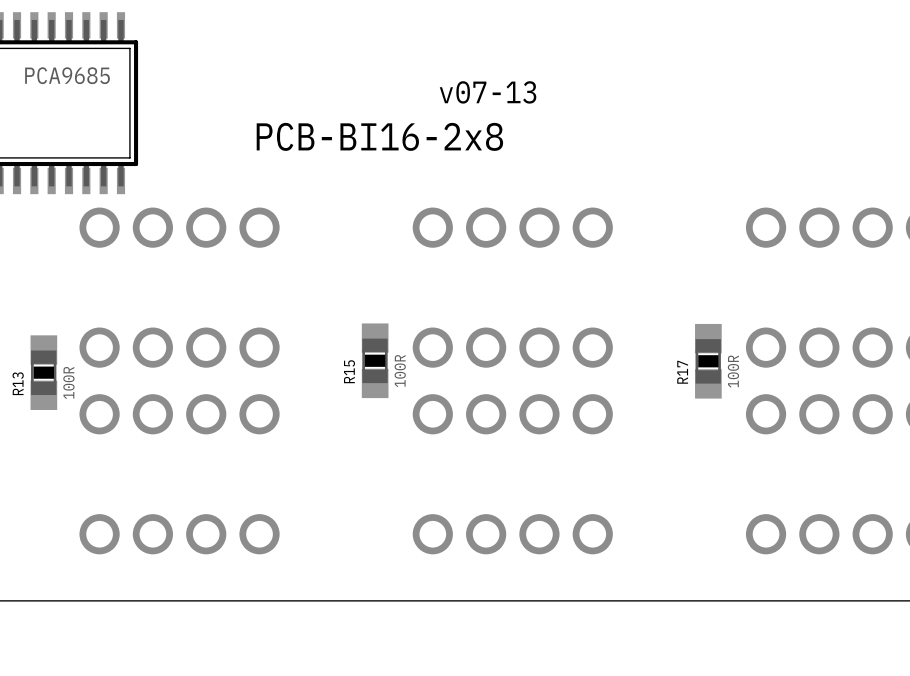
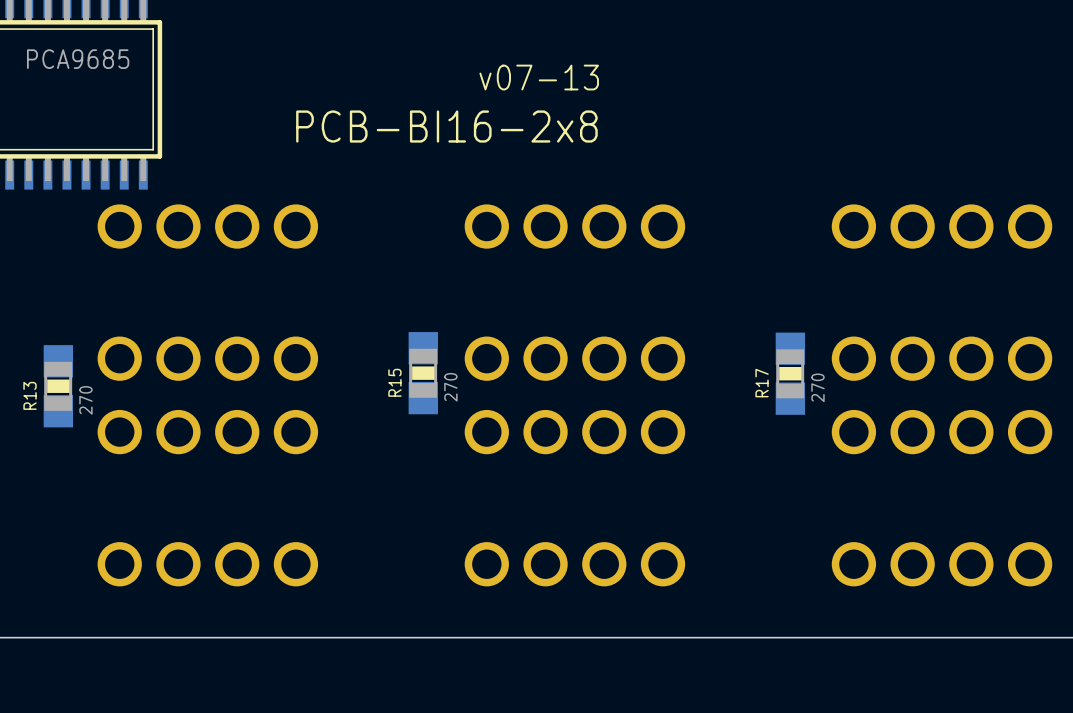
R15 value: 100R (400, 371) -> 270 (450, 387)
R17 value: 100R (733, 371) -> 270 (817, 387)
R13 value: 100R (68, 382) -> 270 (85, 400)

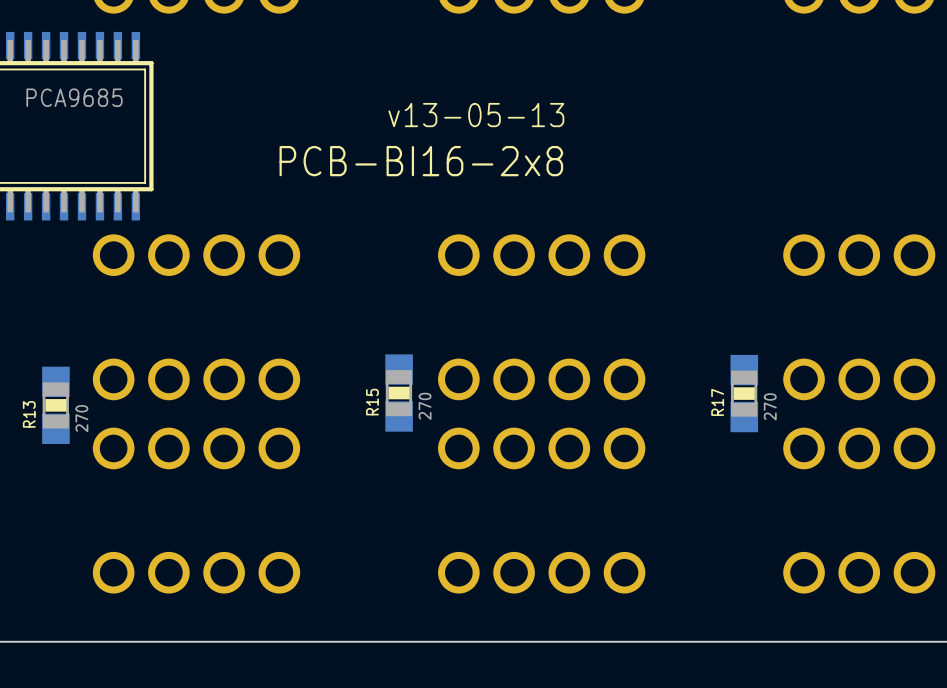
text: v07-13 (539, 77) -> v13-05-13 (476, 115)

